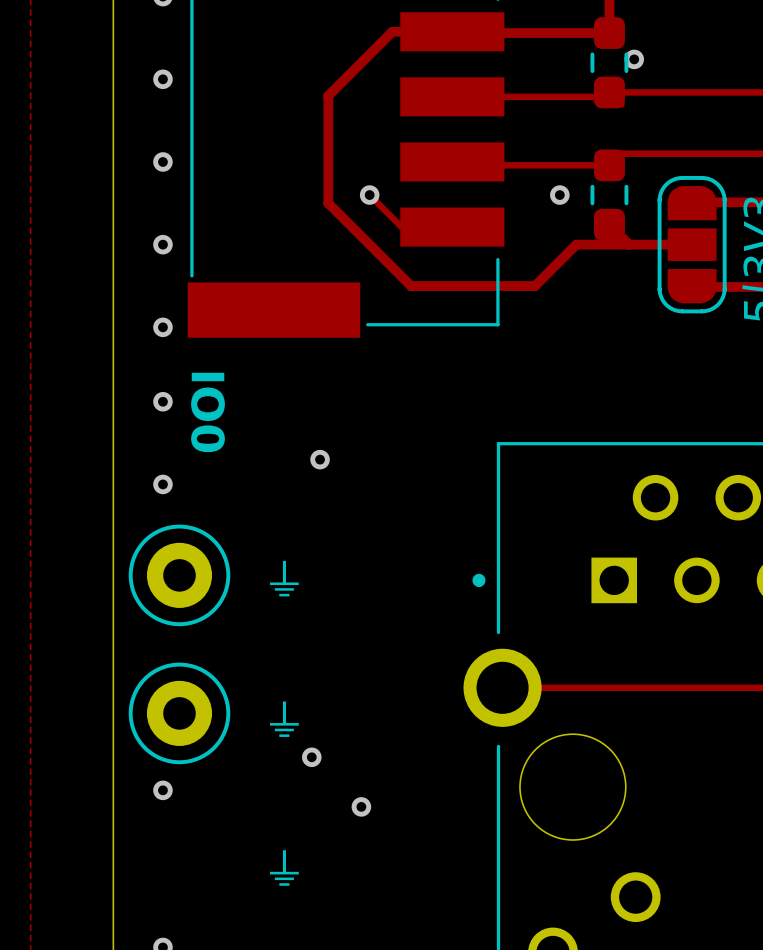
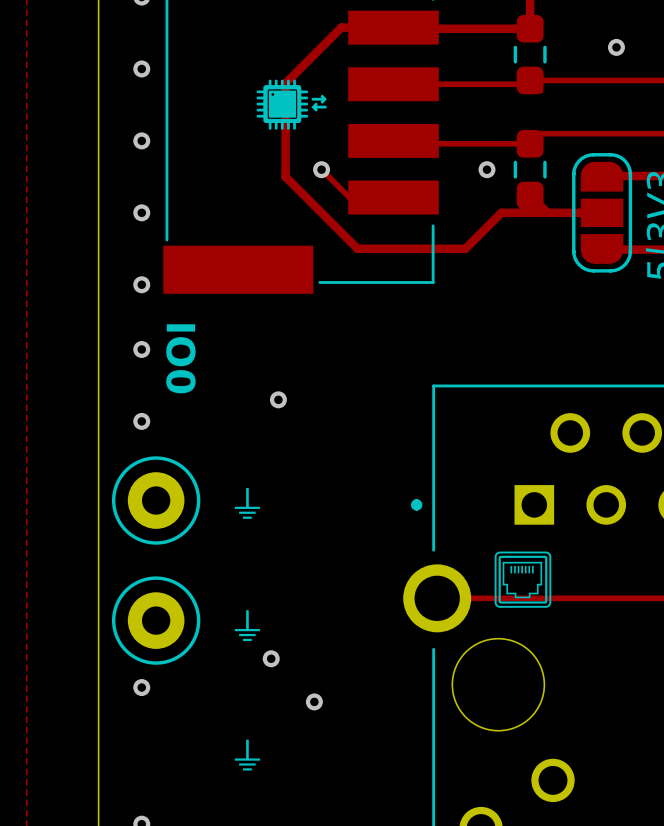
via position: (634, 59) -> (616, 47)
drawing: none -> [256, 79, 327, 130]
drawing: none -> [494, 551, 552, 608]

